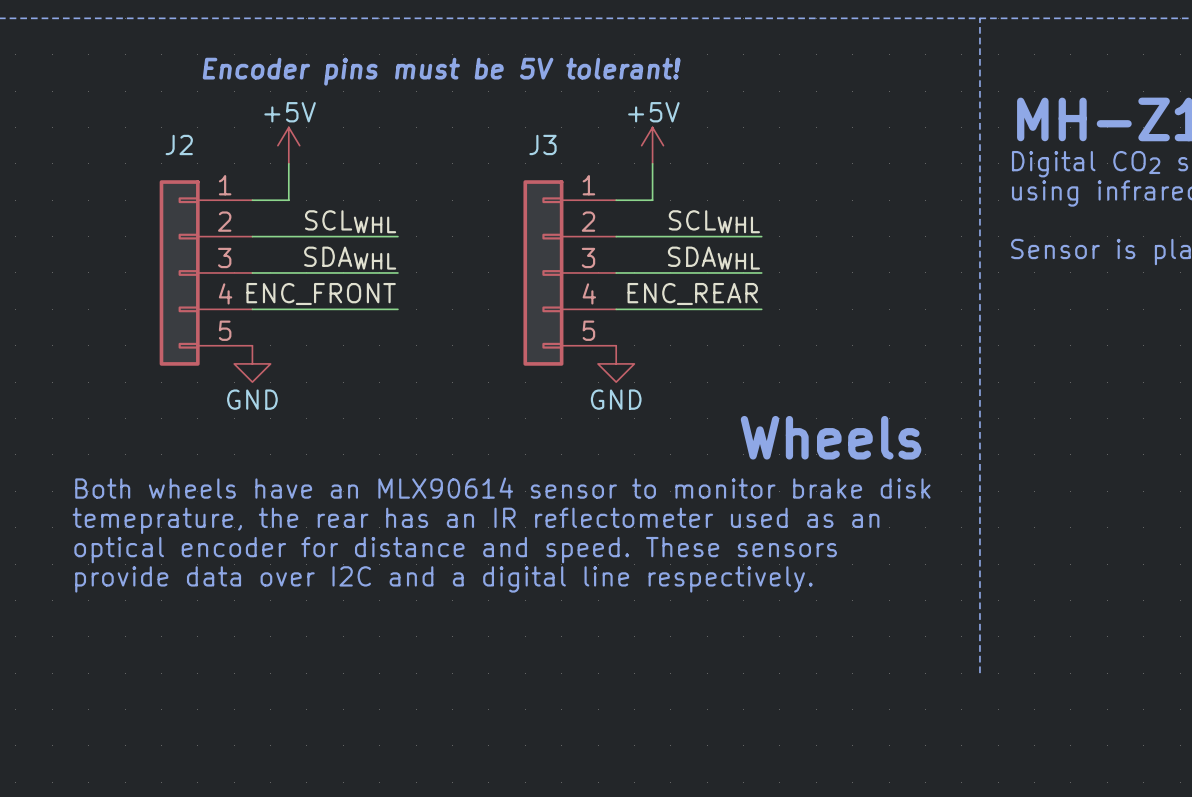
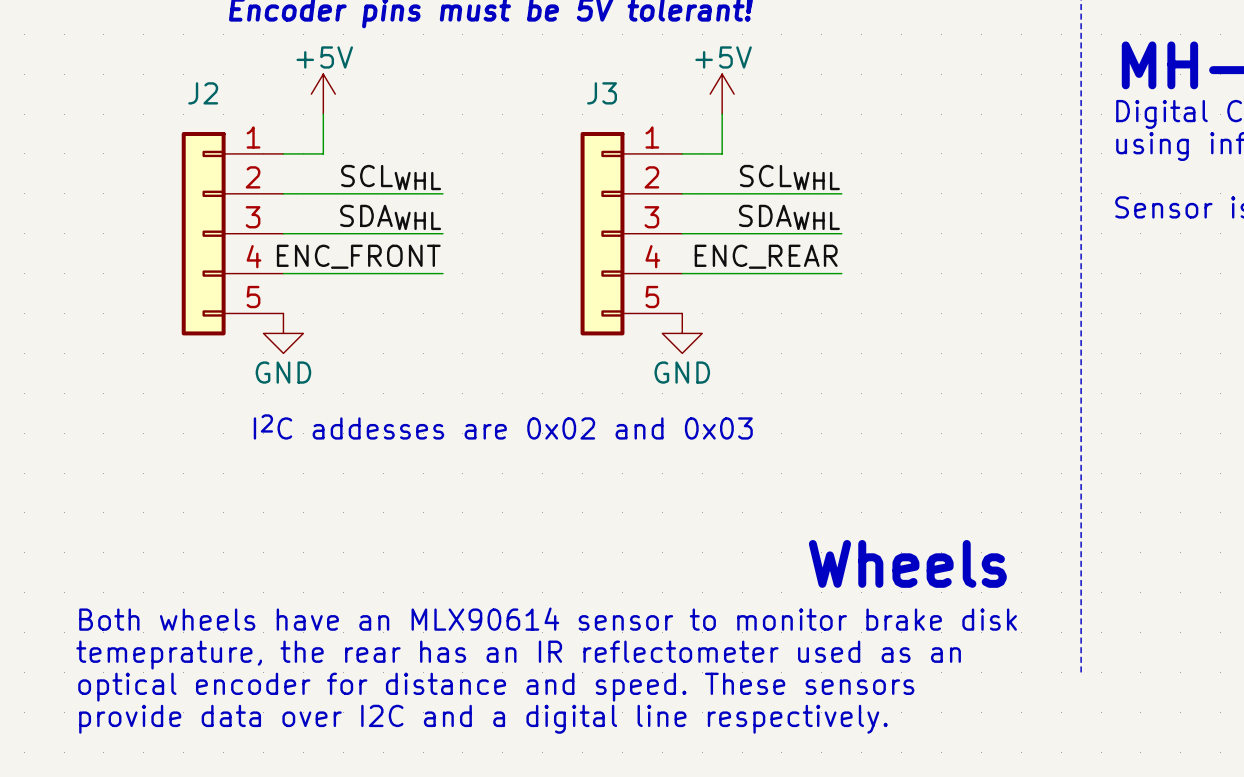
text position: Wheels (831, 437) -> Wheels (907, 563)
text: none -> I2C addesses are 0x02 and 0x03 (503, 426)
text position: Both wheels have an MLX90614 sensor to monitor brake disk (502, 488) -> Both wheels have an MLX90614 sensor to monitor brake disk (548, 619)
text position: temeprature, the rear has an IR reflectometer used as an (476, 520) -> temeprature, the rear has an IR reflectometer used as an (518, 655)
text position: optical encoder for distance and speed. These sensors (455, 550) -> optical encoder for distance and speed. These sensors (496, 687)
text position: provide data over I2C and a digital line respectively. (443, 579) -> provide data over I2C and a digital line respectively. (483, 719)

